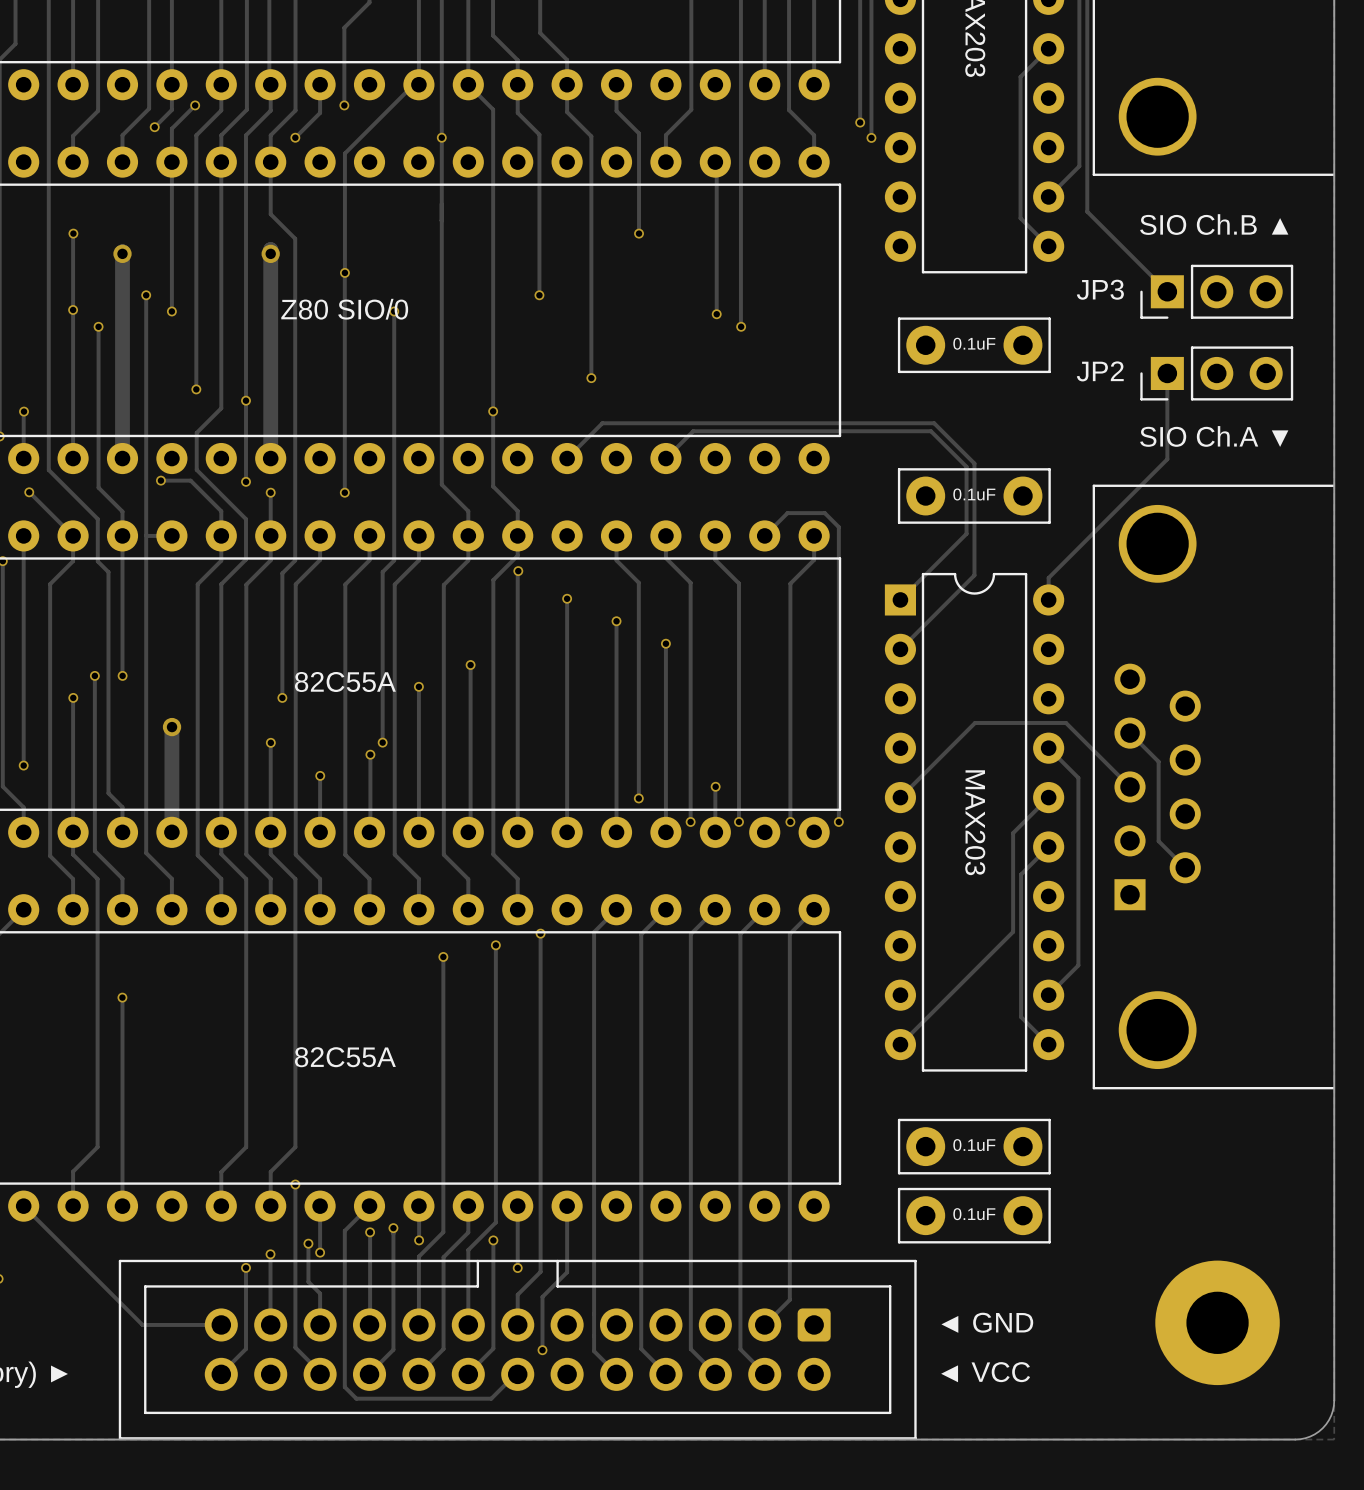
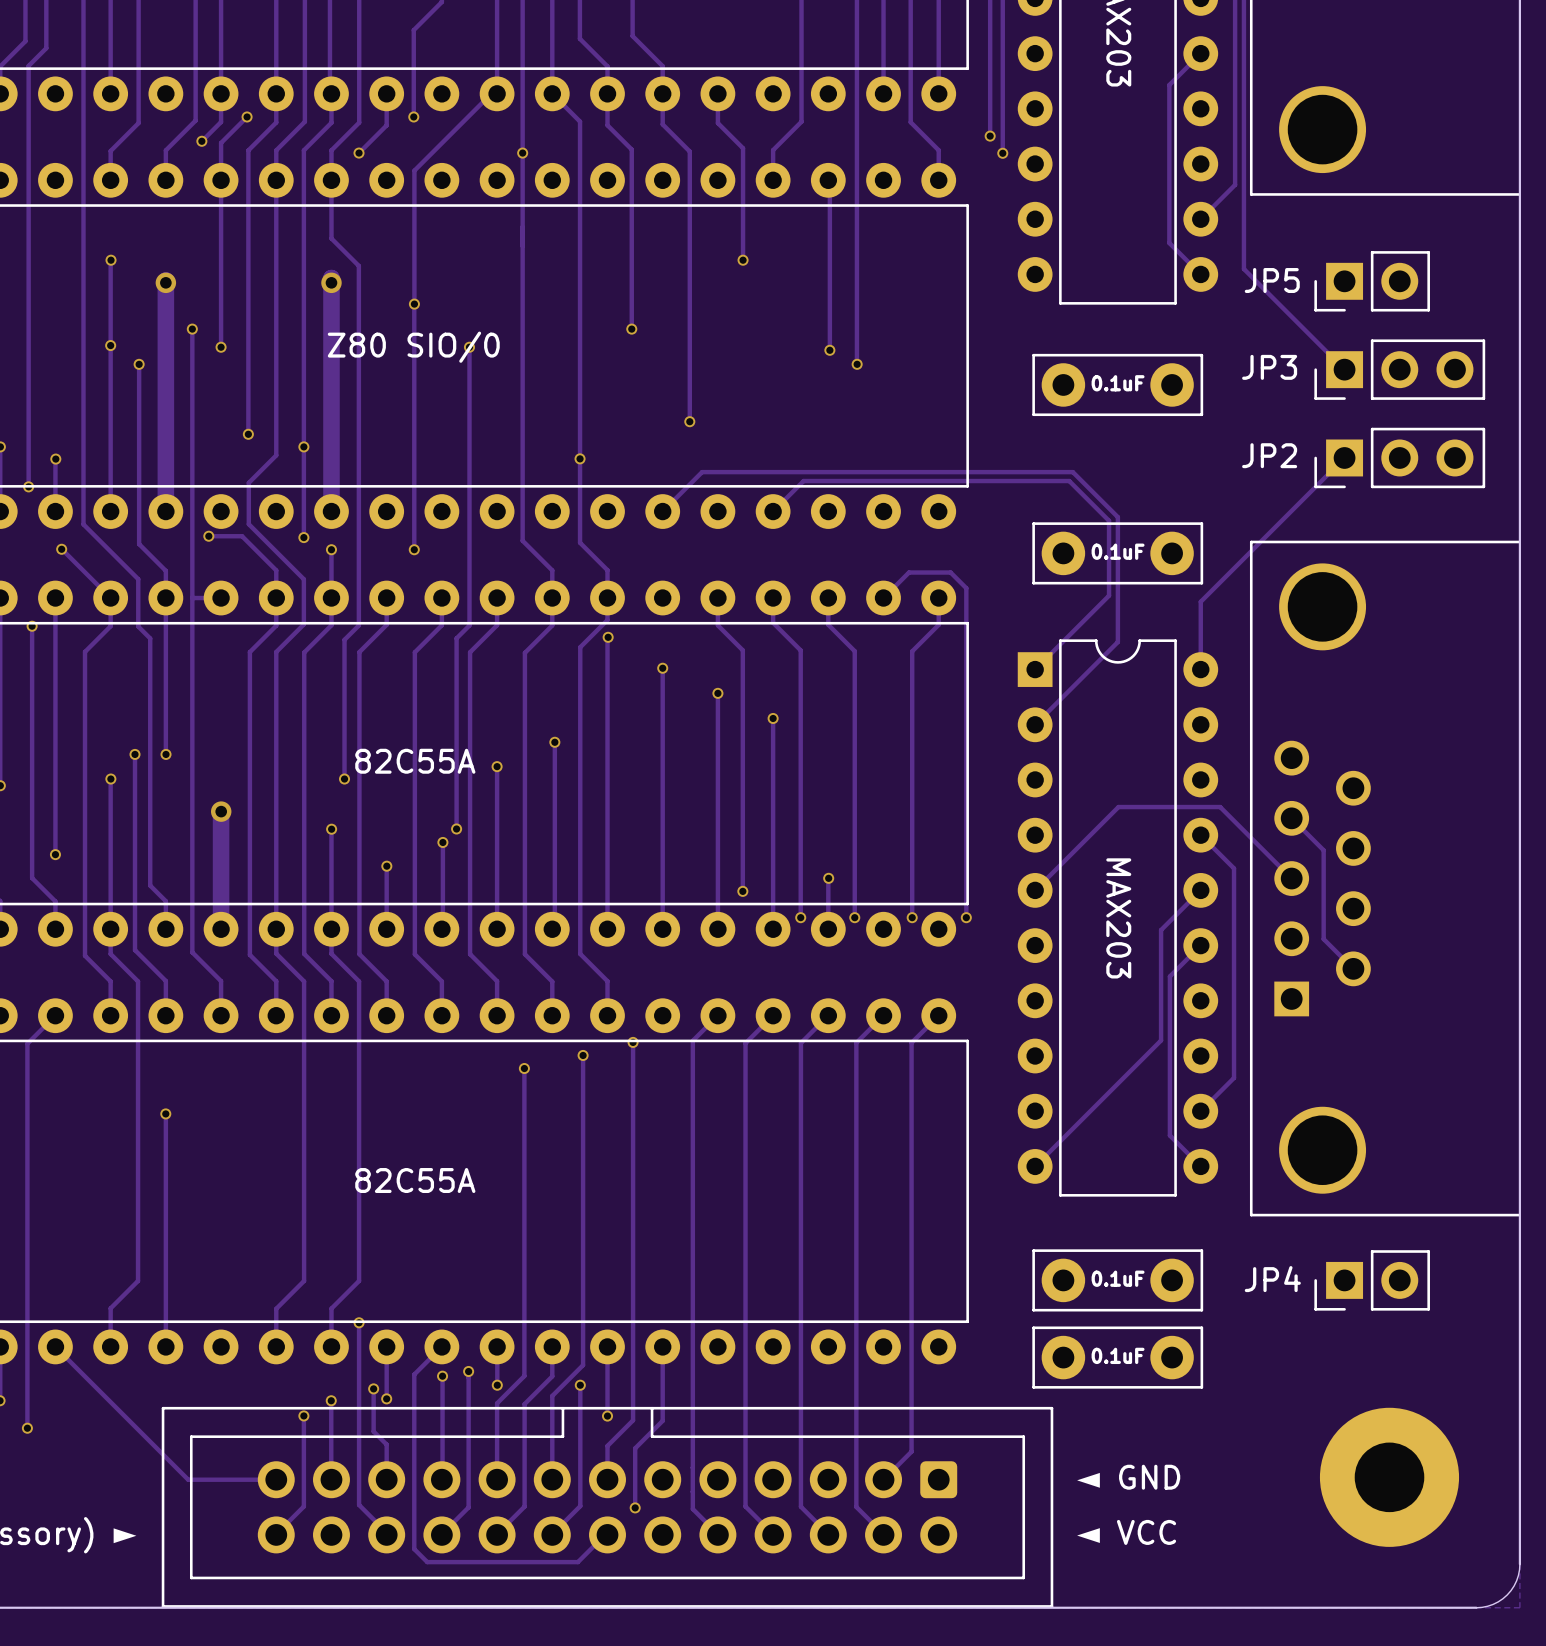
track: (1087, 211) (1167, 291) -> (1243, 235) (1243, 269) (1344, 369)
text: SIO Ch.B ▲ (1214, 224) -> none
JP5: none -> (1372, 281)
JP3 position: (1216, 291) -> (1399, 369)
track: (1167, 373) (1167, 459) (1048, 577) -> (1344, 457) (1200, 601) (1200, 644)
JP2 position: (1216, 373) -> (1399, 457)
text: SIO Ch.A ▼ (1214, 436) -> none
JP4: none -> (1372, 1280)

